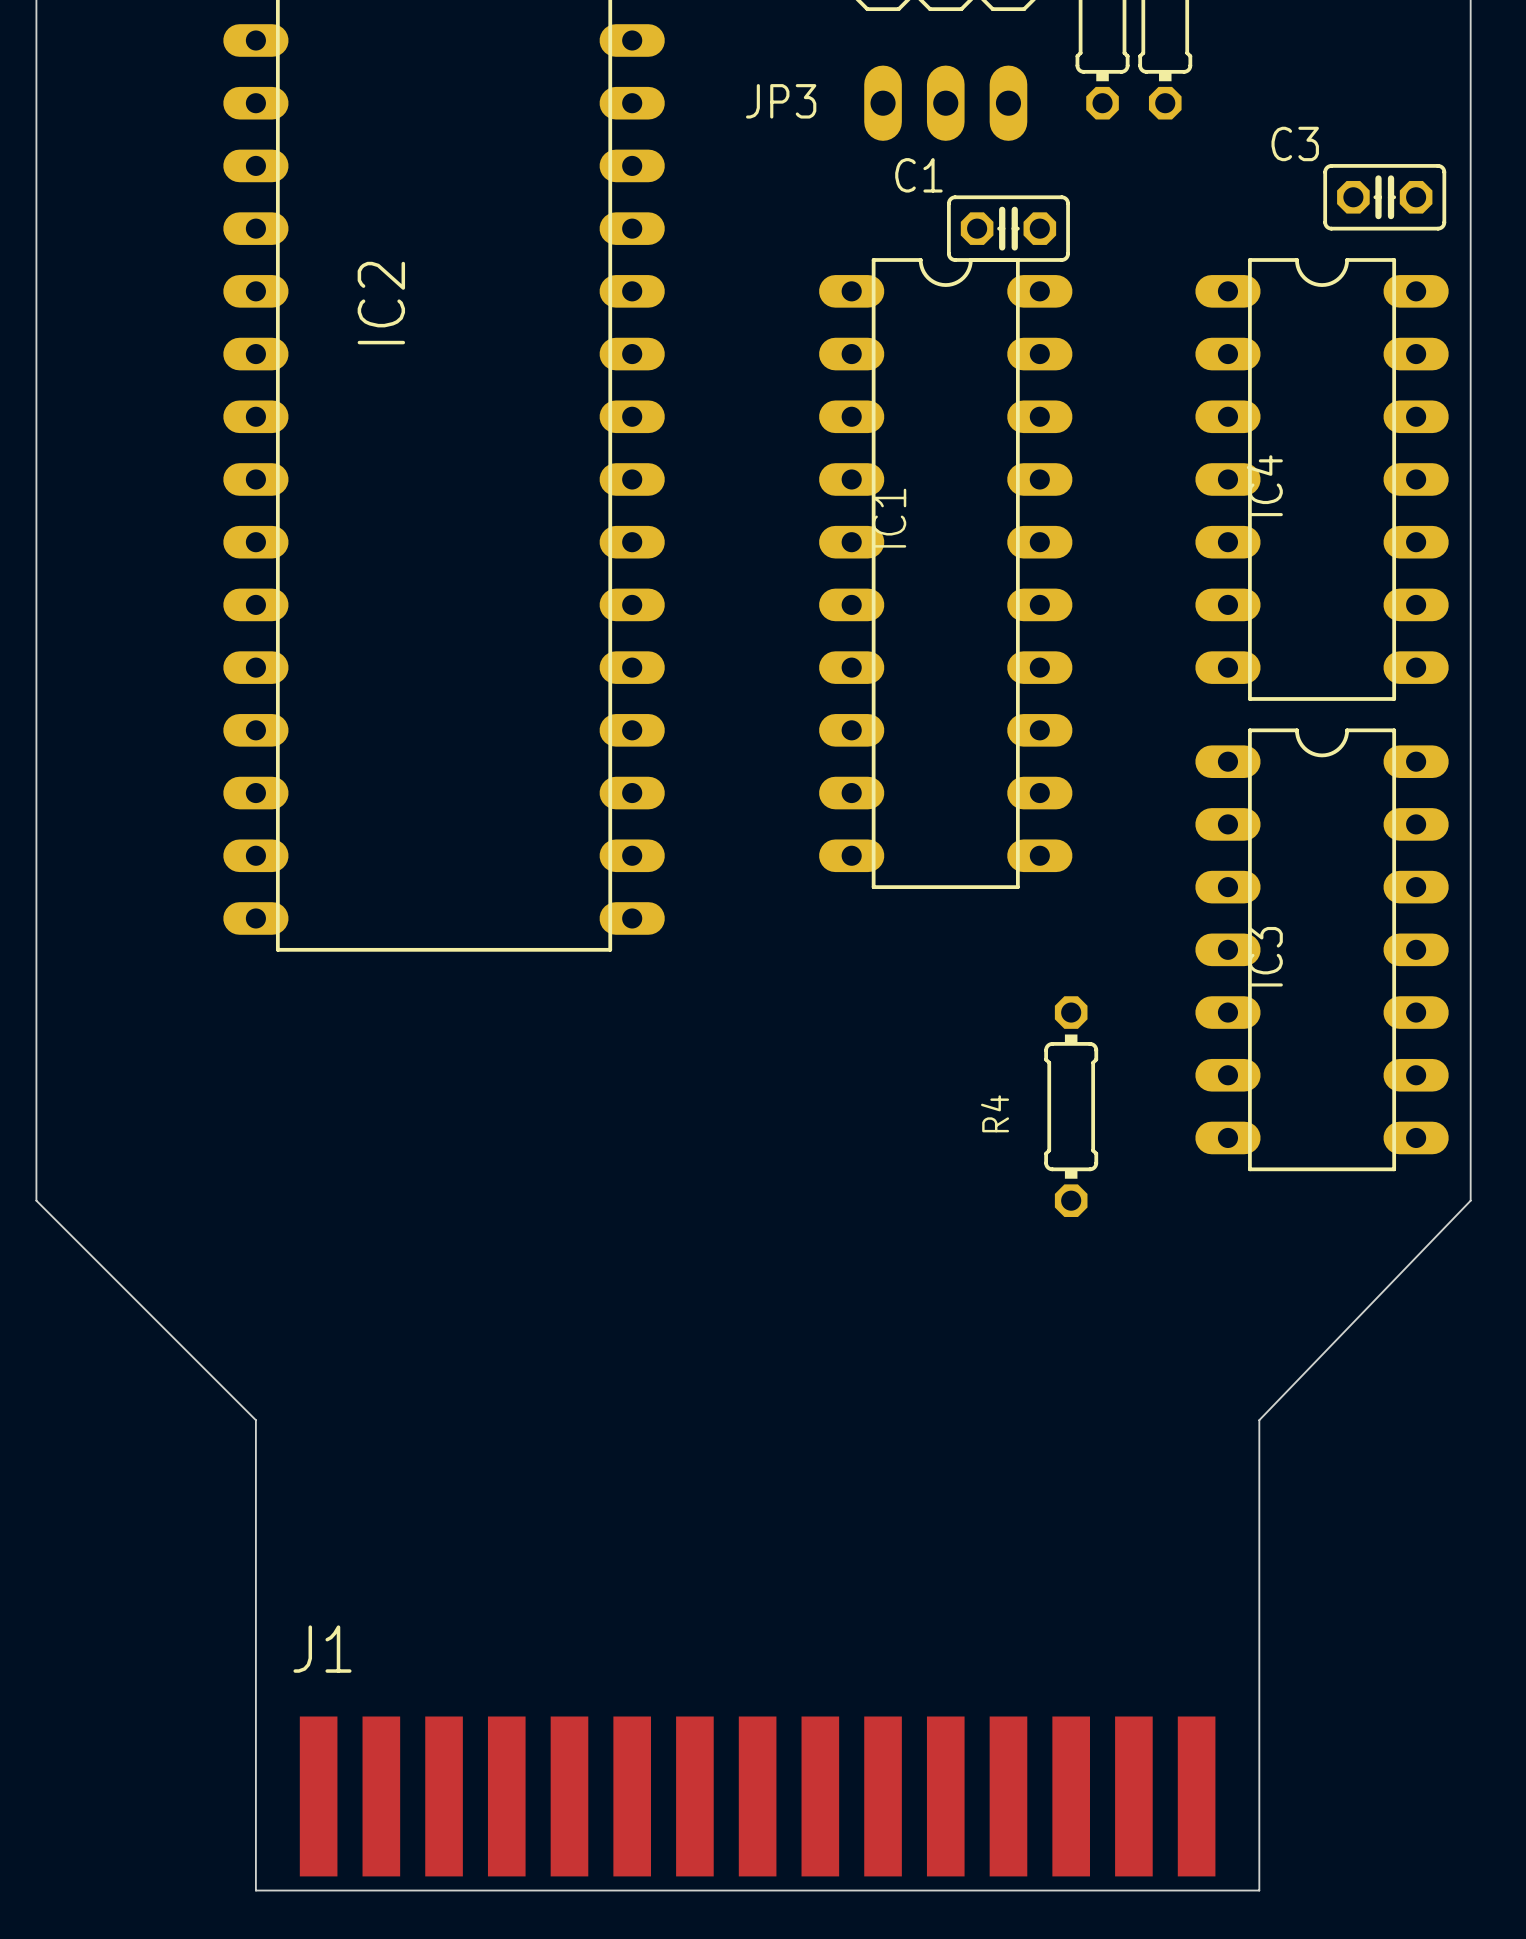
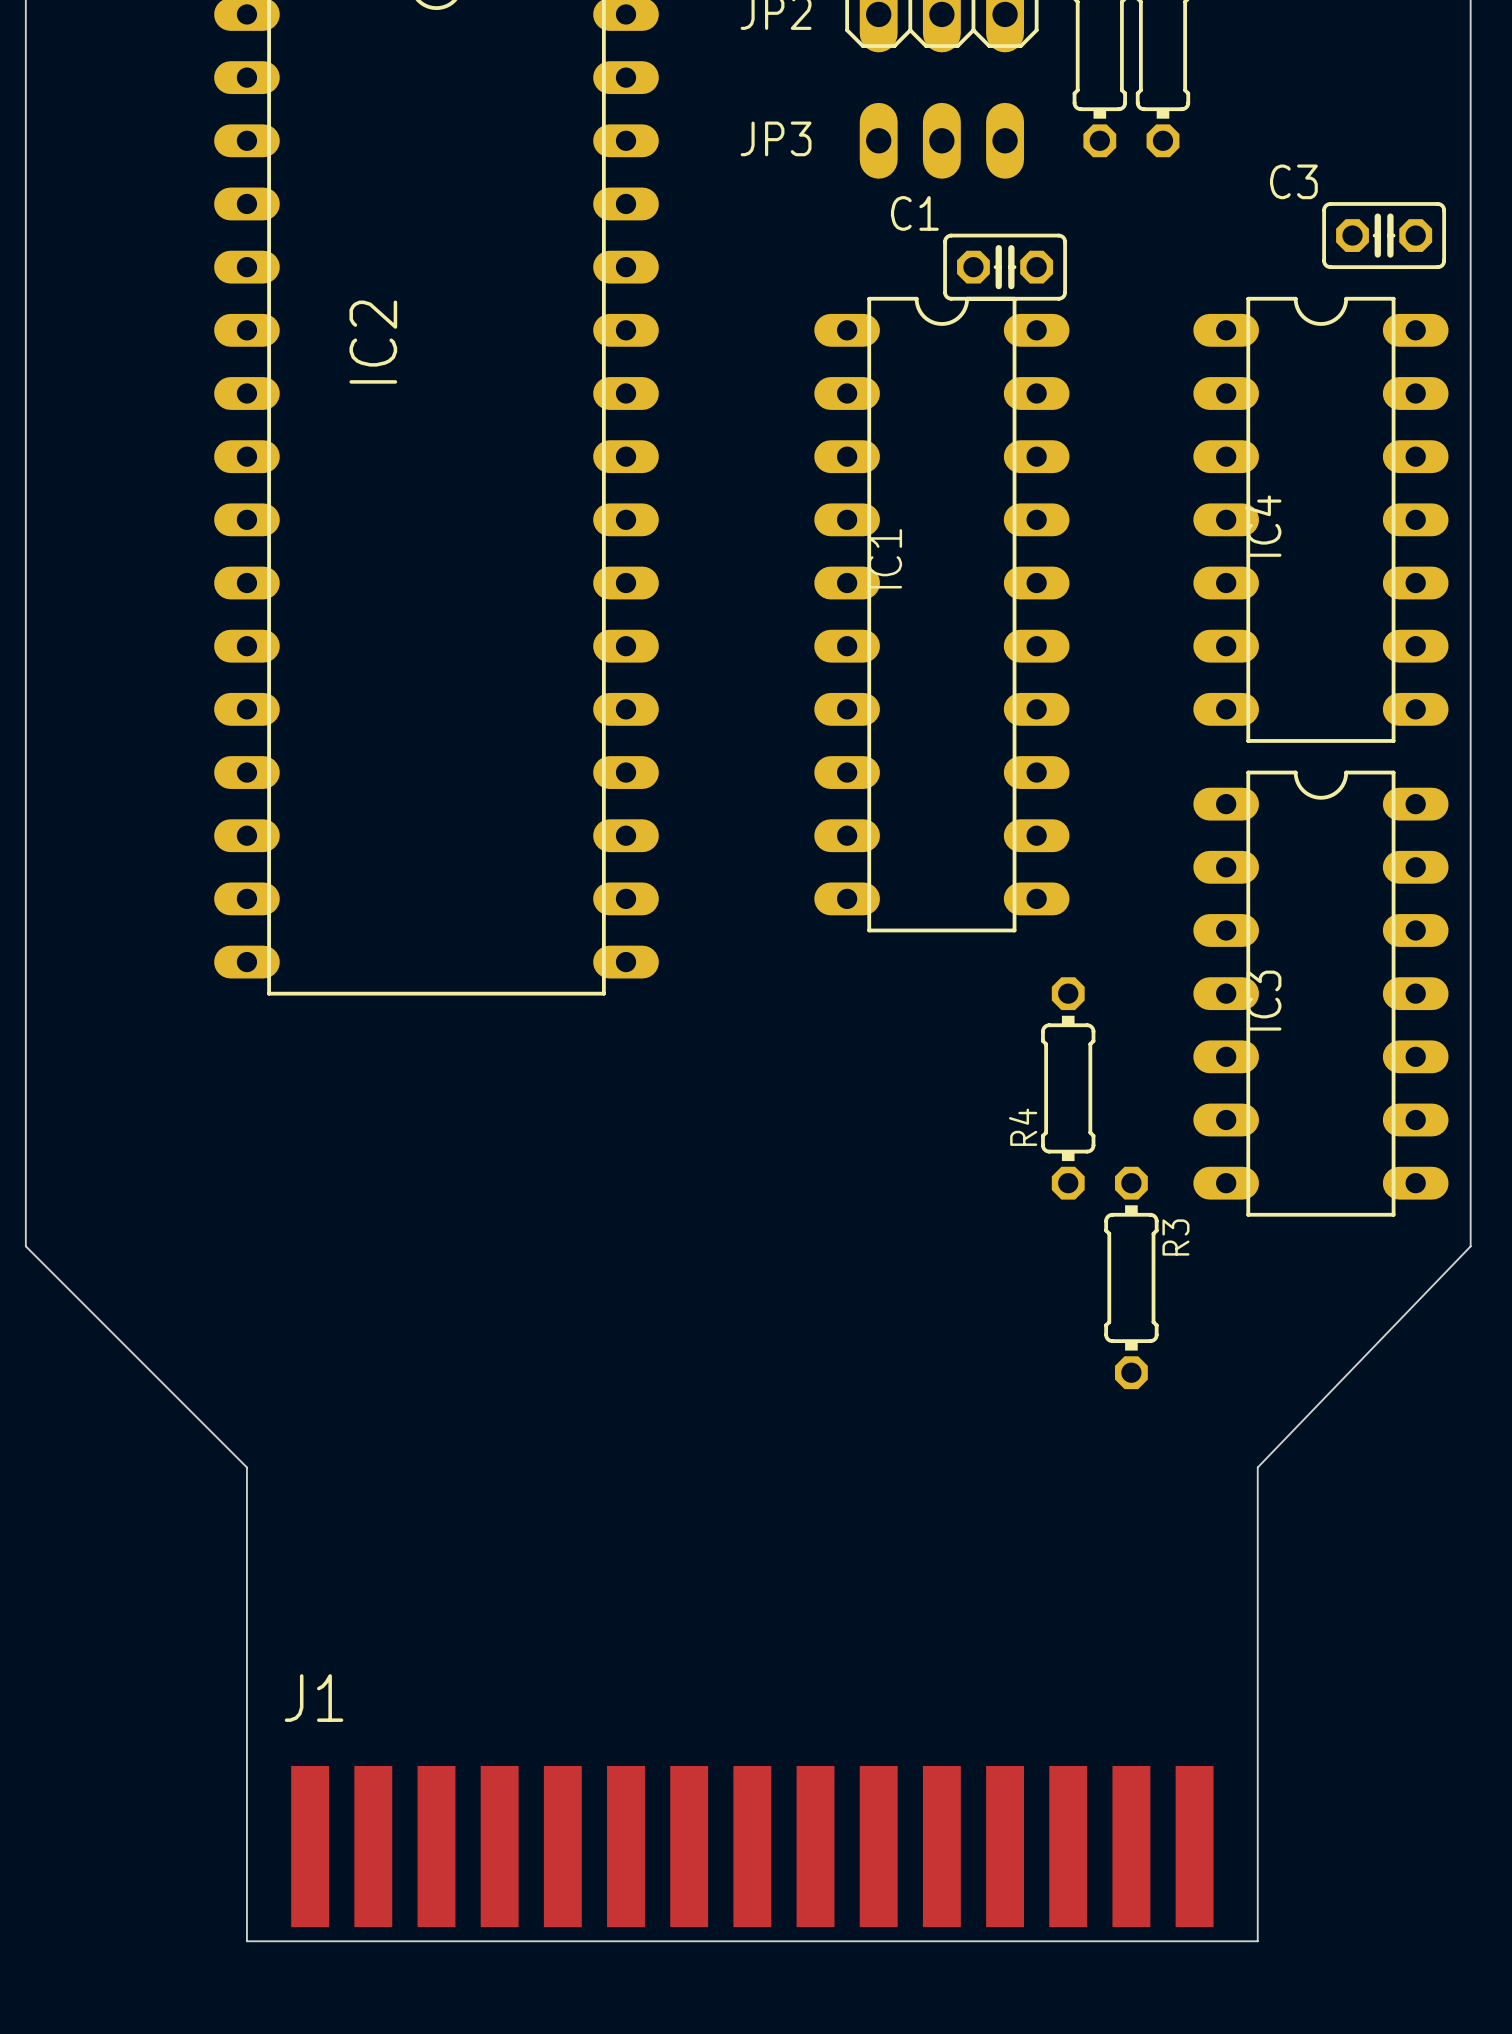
R4 position: (1071, 1106) -> (1068, 1088)
R4 name position: R4 (995, 1113) -> R4 (1023, 1127)
R3: none -> (1131, 1277)

